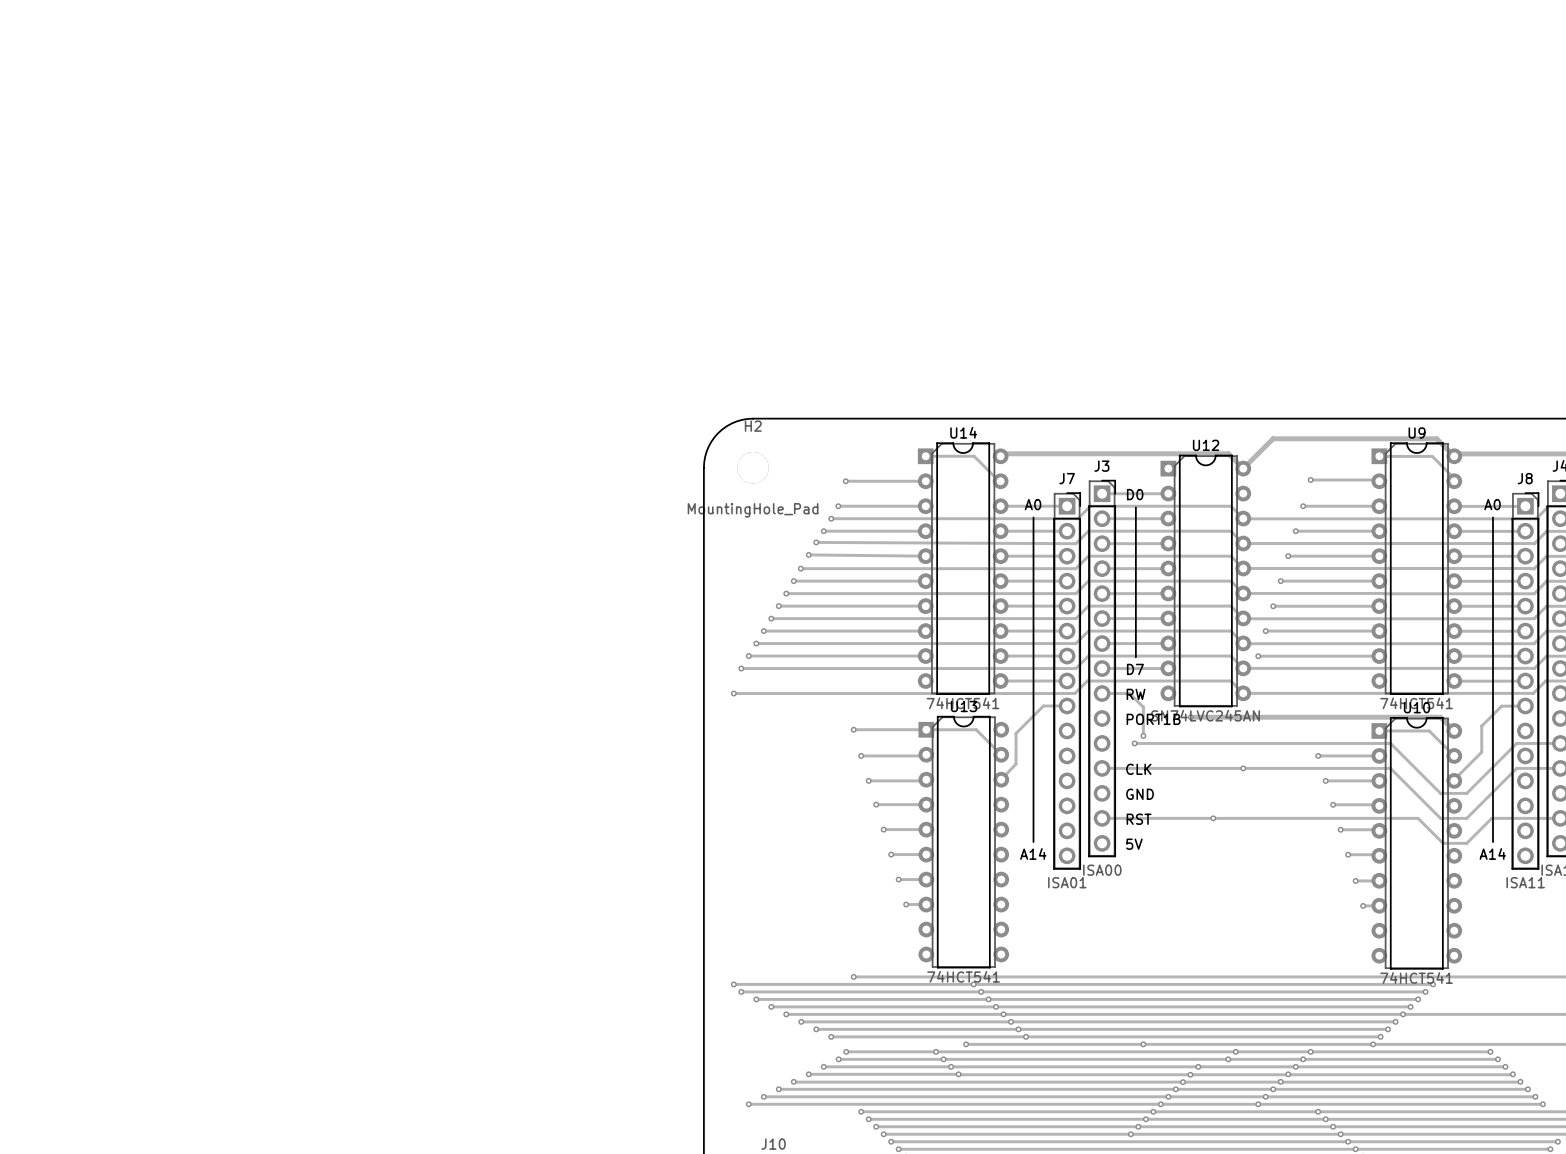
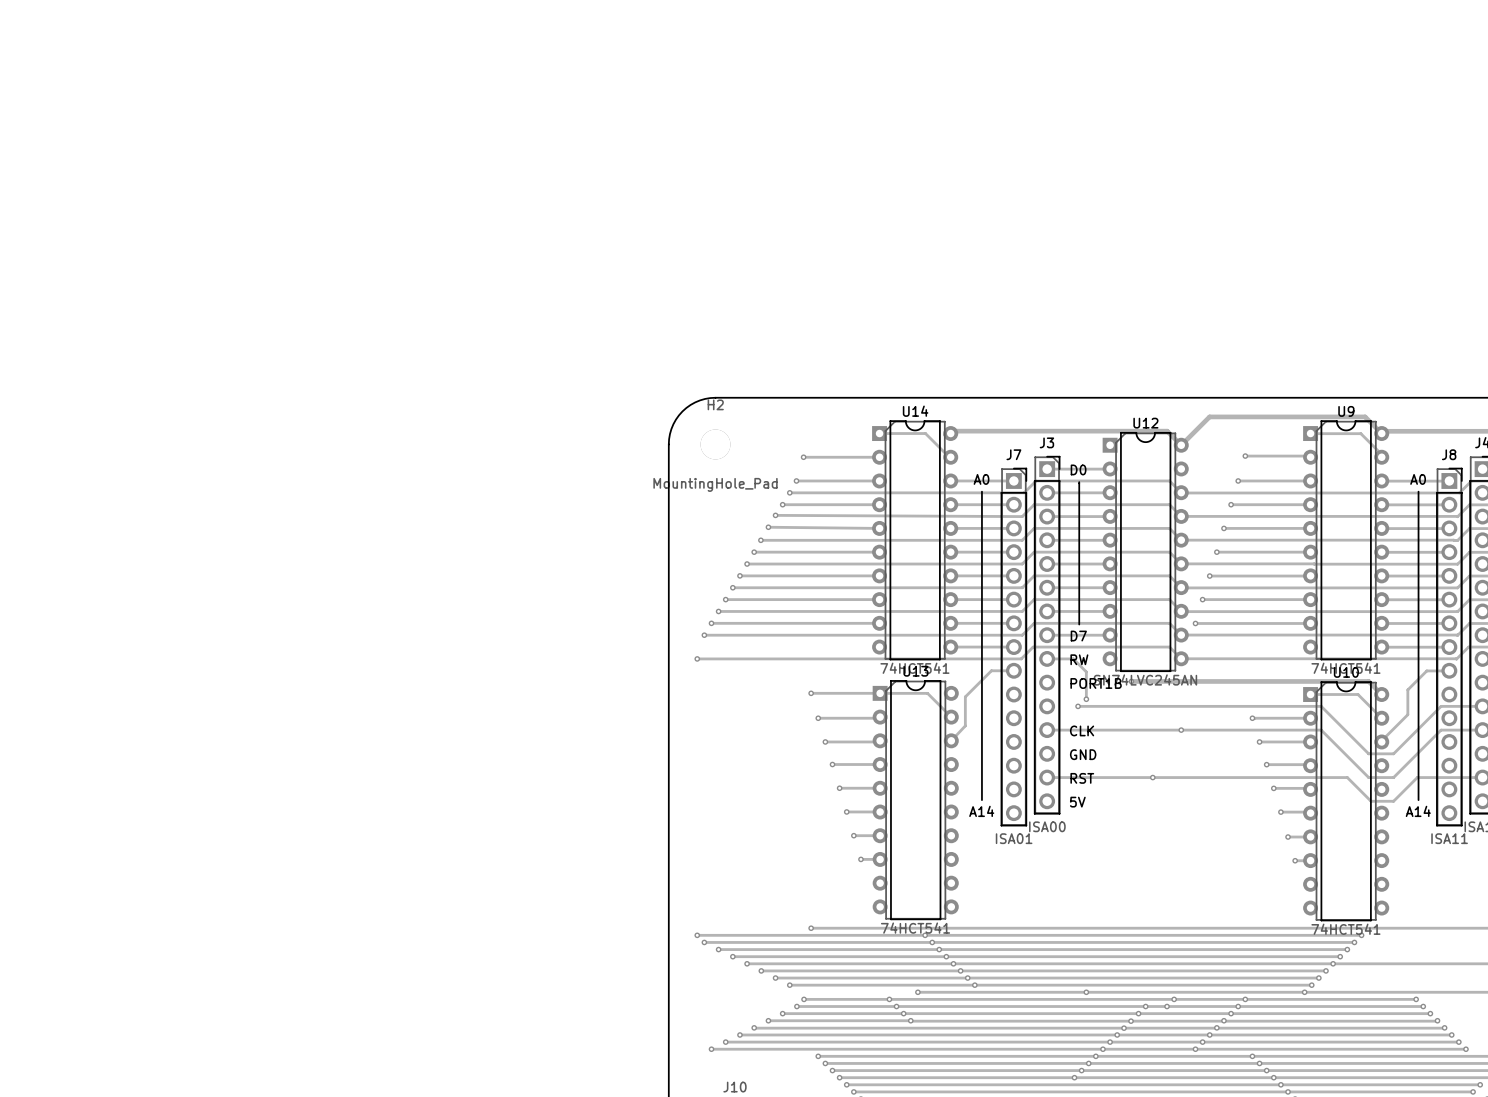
via: none -> (1145, 1006)

